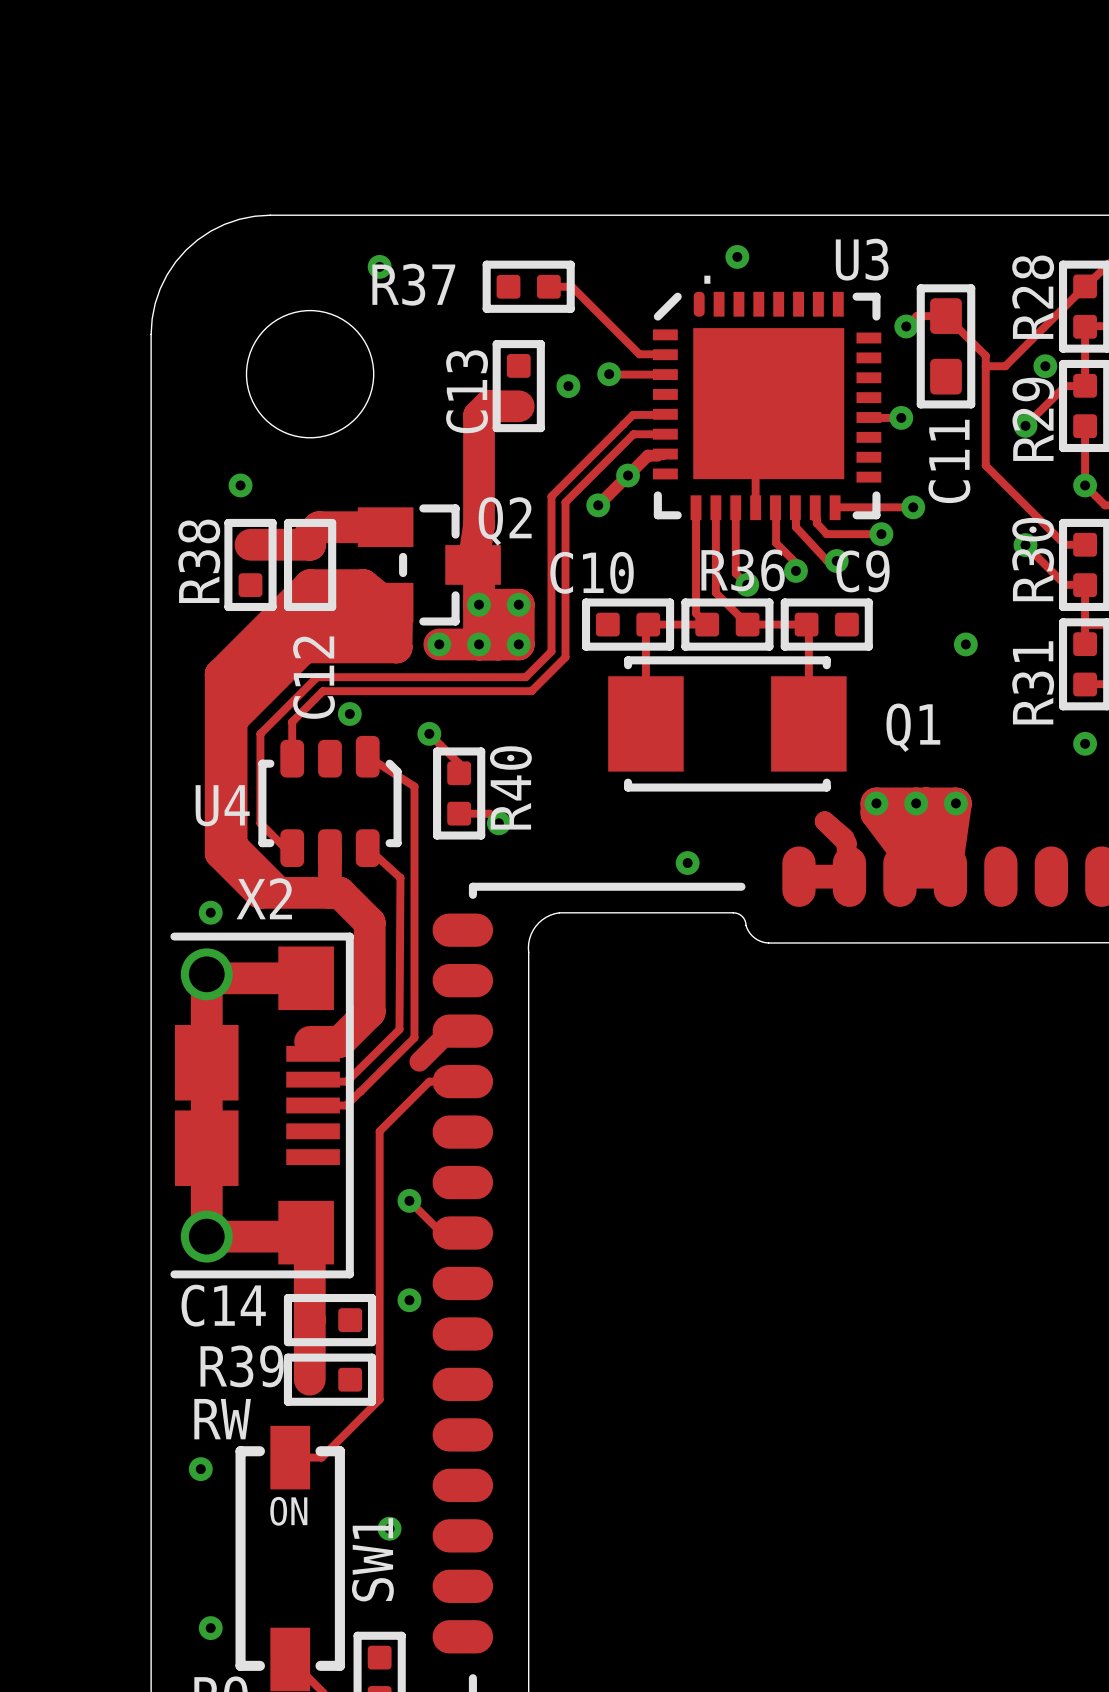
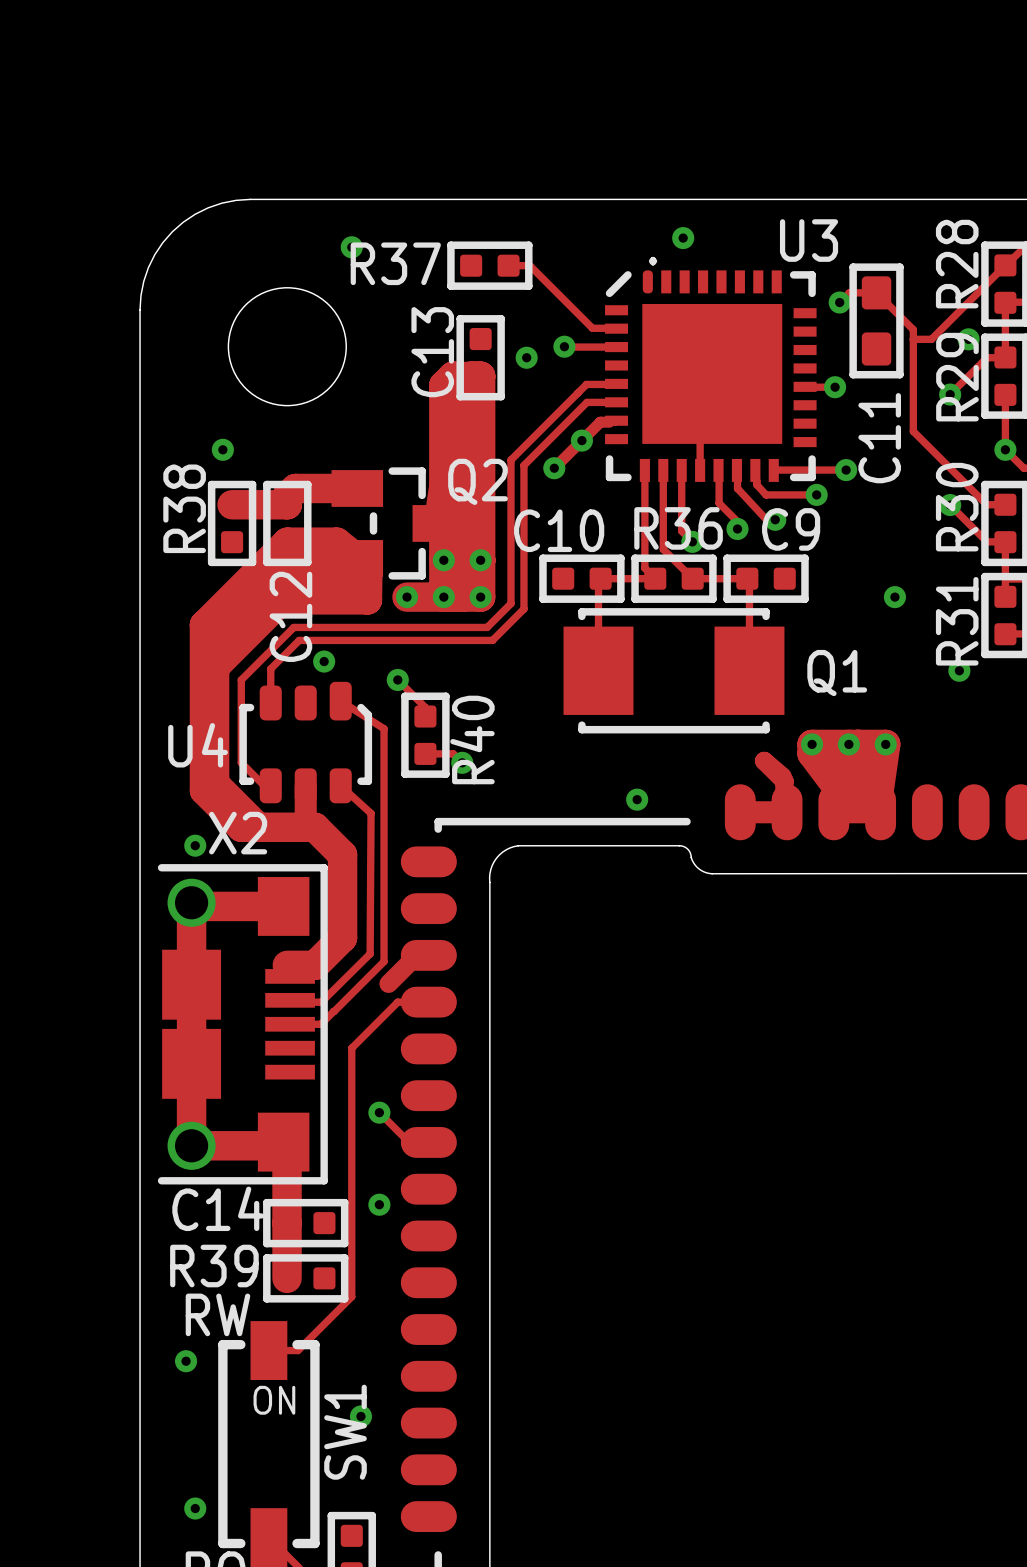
track: none -> (443, 523) (480, 560) (480, 376) (471, 376) (462, 385) (462, 523)
via position: (1085, 743) -> (959, 670)

